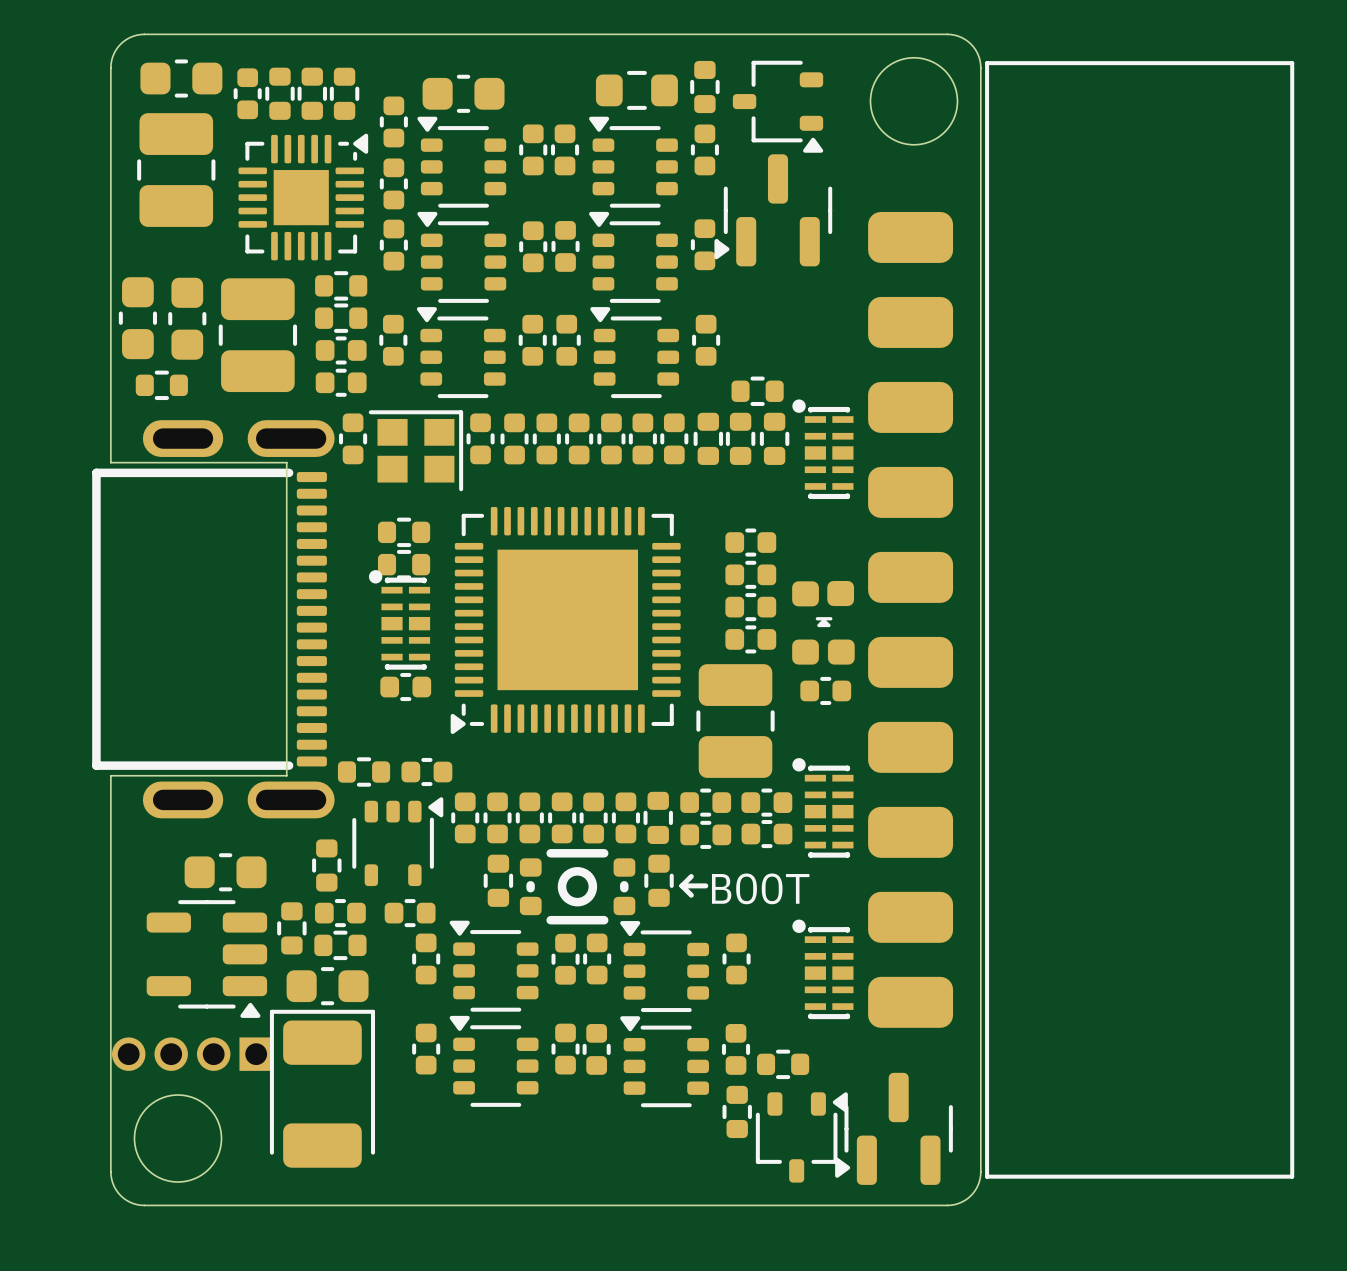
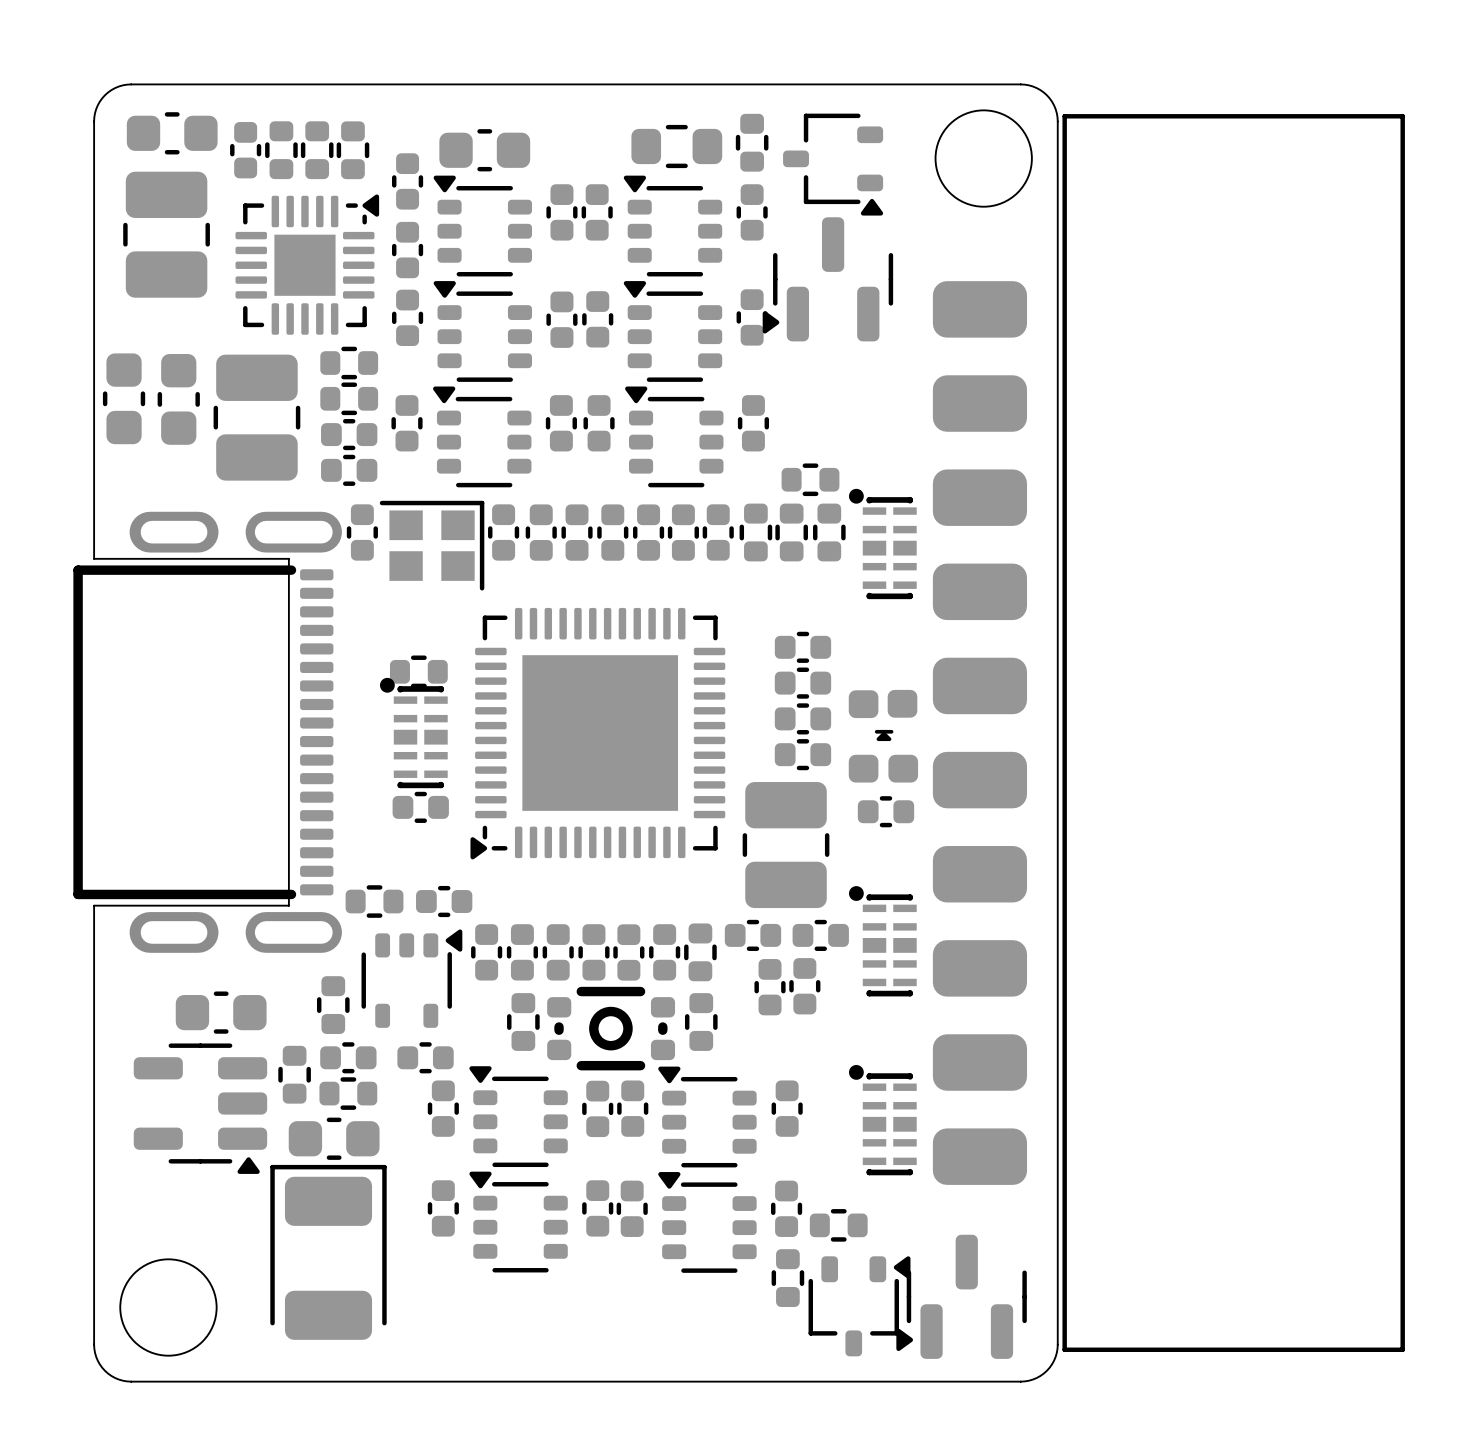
part: (161, 385) -> none
part: (404, 532) -> none
part rotation: 0° (705, 834) -> 90° clockwise (770, 987)
part rotation: 0° (766, 834) -> 90° clockwise (804, 986)
line: (691, 876) (681, 885) -> none
line: (681, 885) (691, 895) -> none
line: (681, 885) (705, 885) -> none
text: BOOT (760, 888) -> none
part: (192, 1054) -> none

